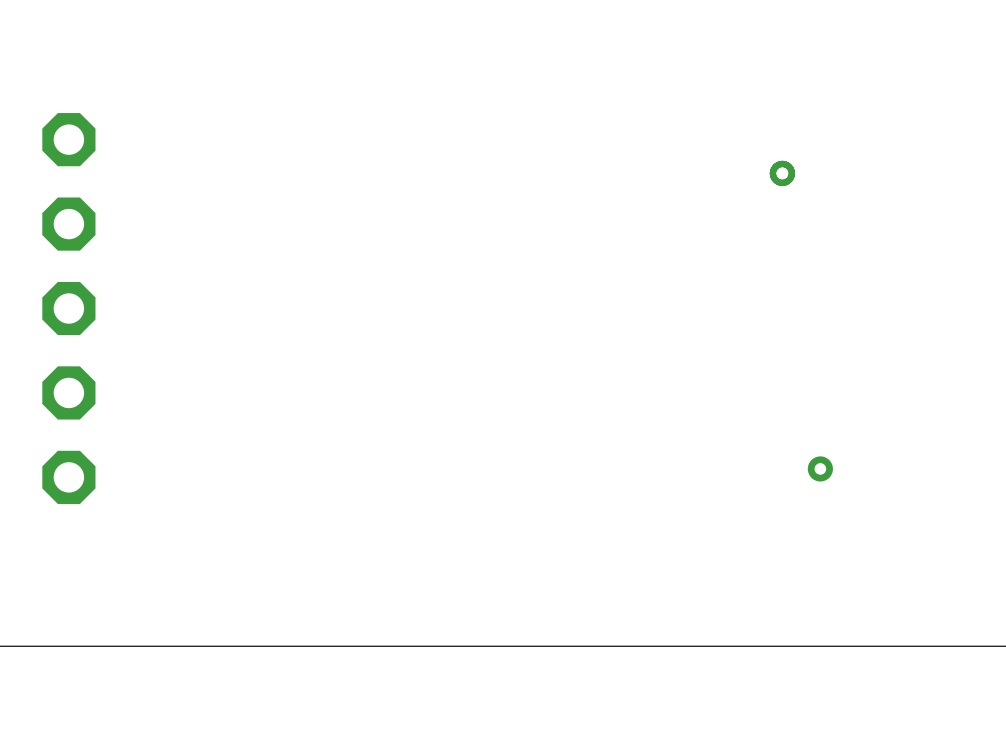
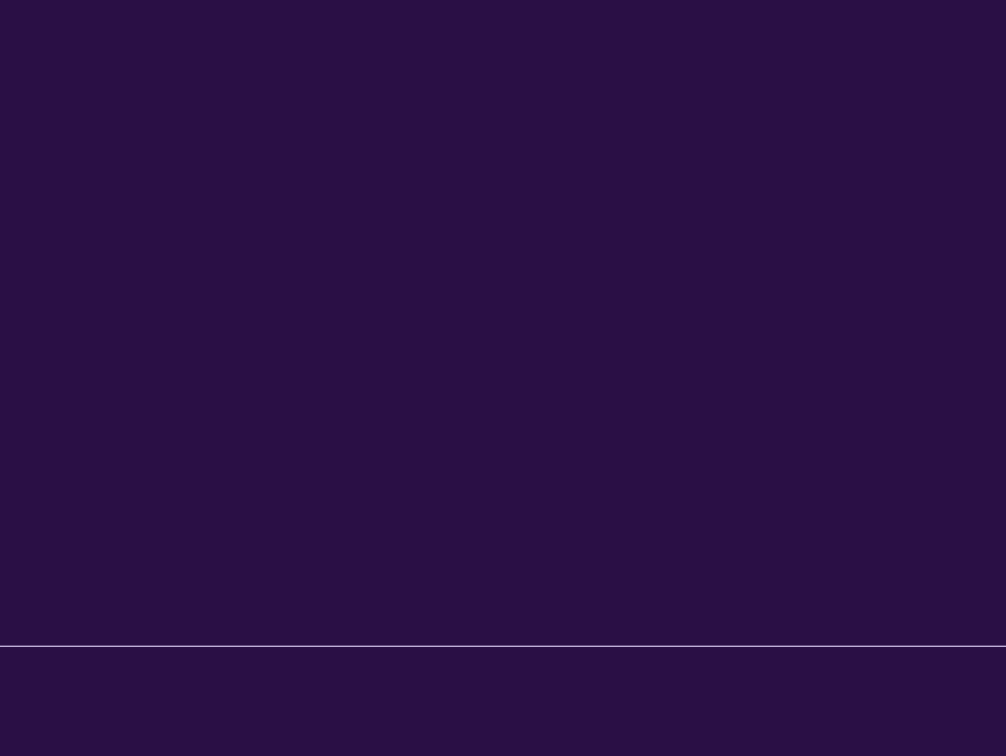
part: (68, 139) -> none
via: (782, 173) -> none
part: (68, 224) -> none
part: (68, 308) -> none
part: (68, 392) -> none
via: (820, 468) -> none
part: (68, 477) -> none

